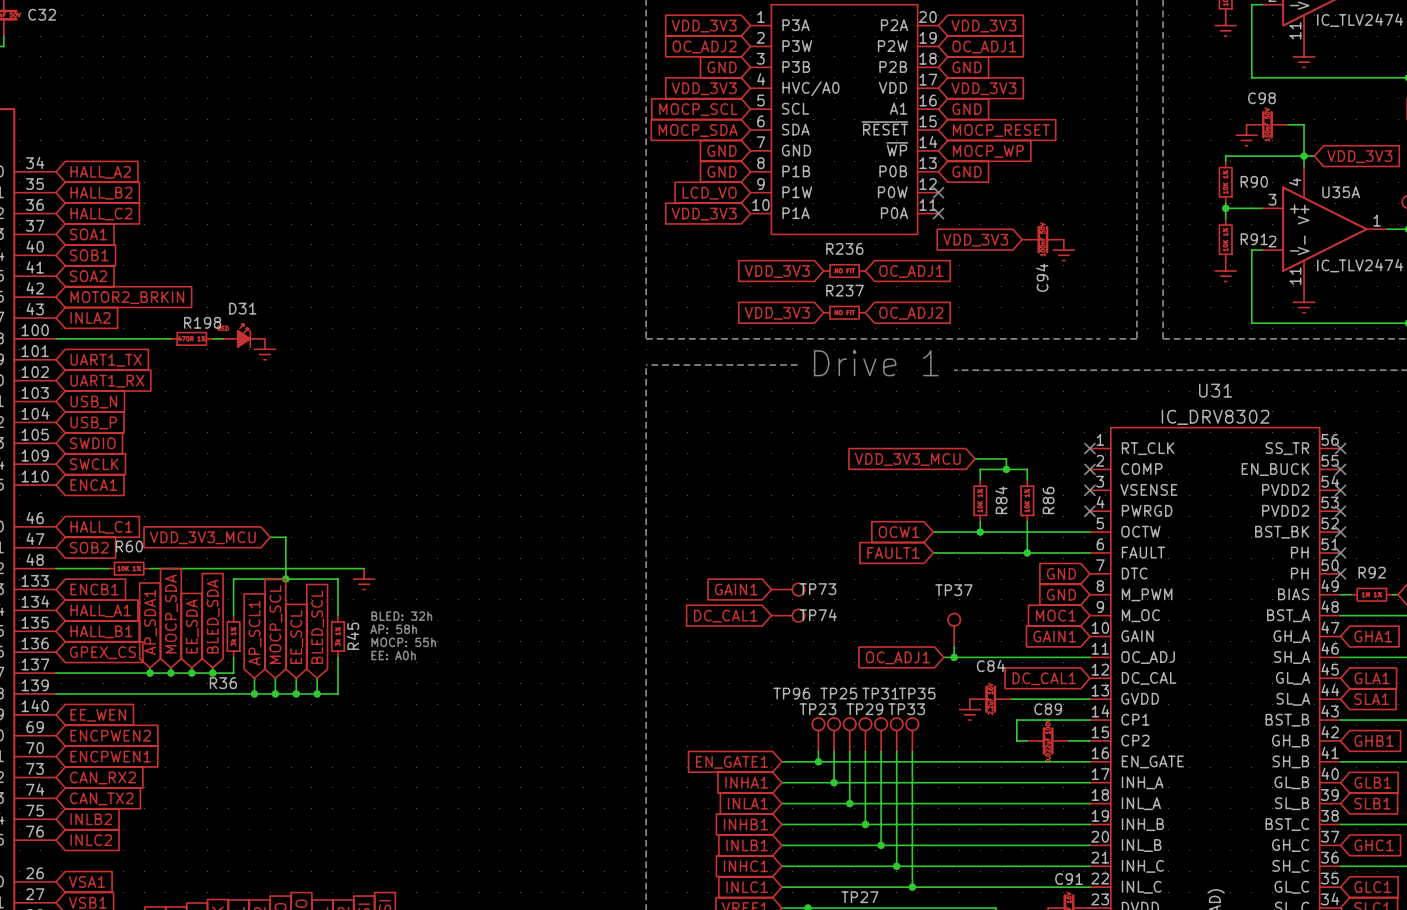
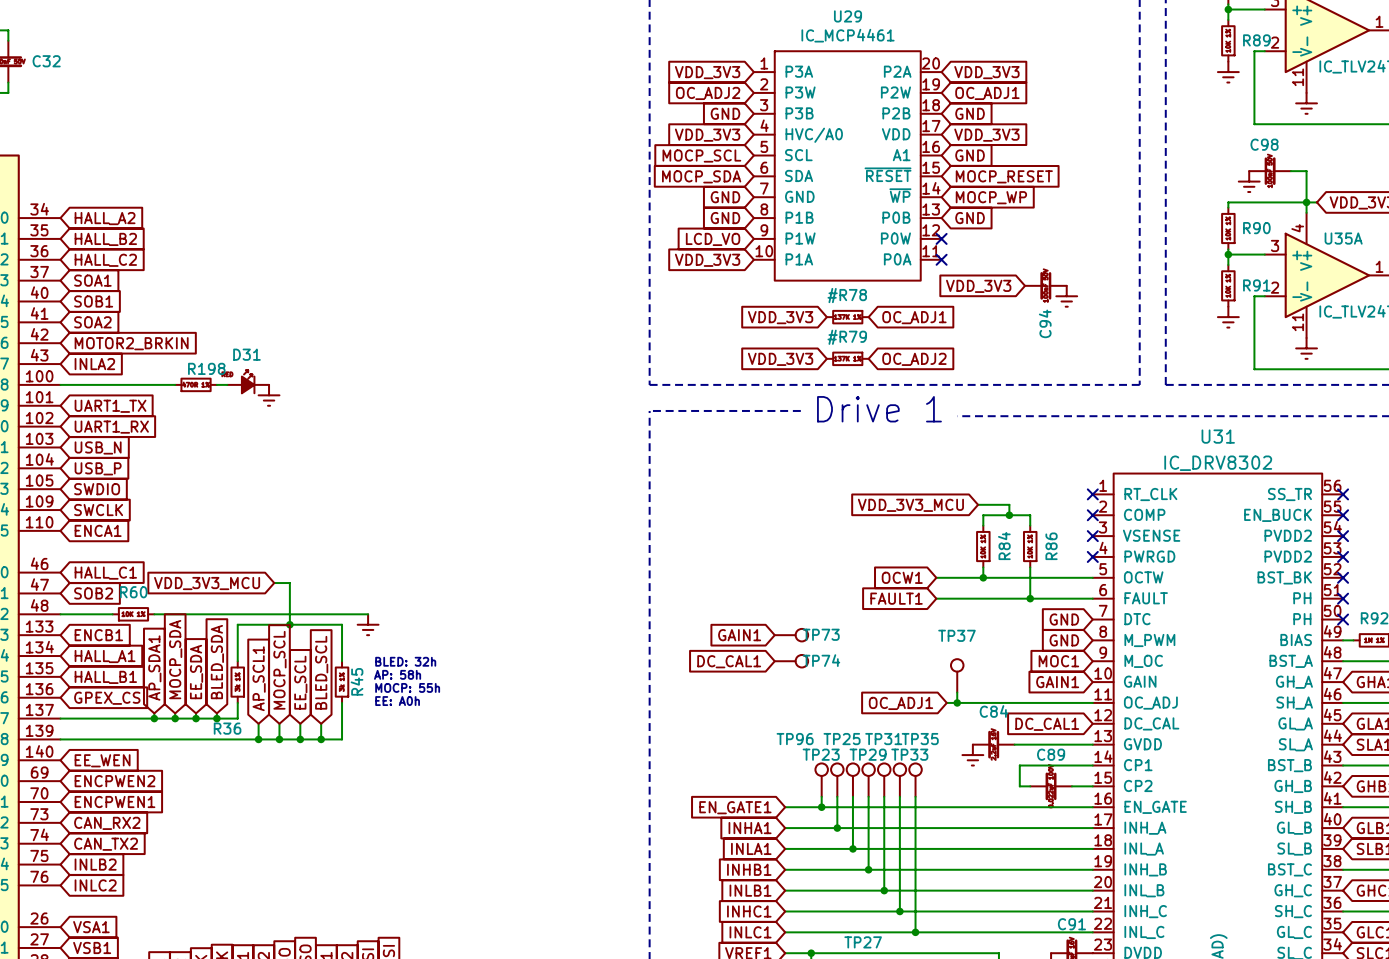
R236: (844, 271) -> none
#R78: none -> (847, 317)
R237: (844, 312) -> none
#R79: none -> (847, 358)

